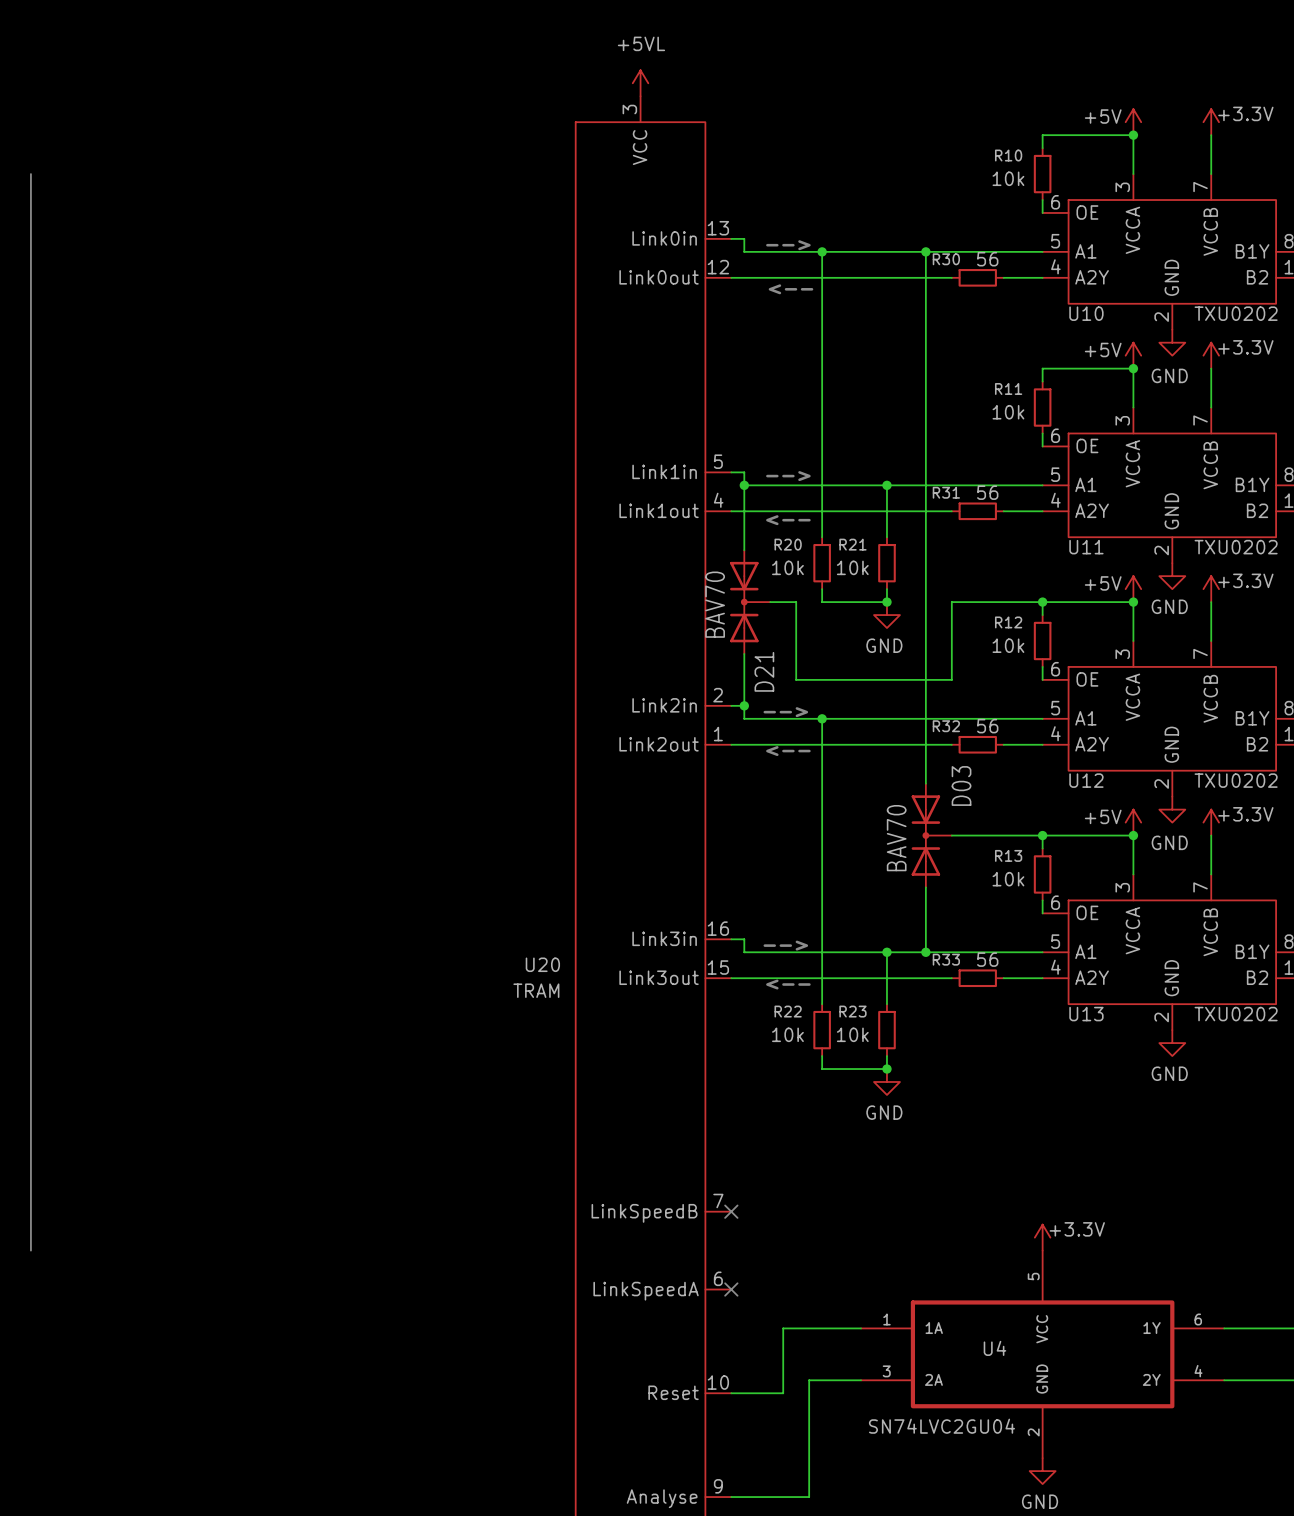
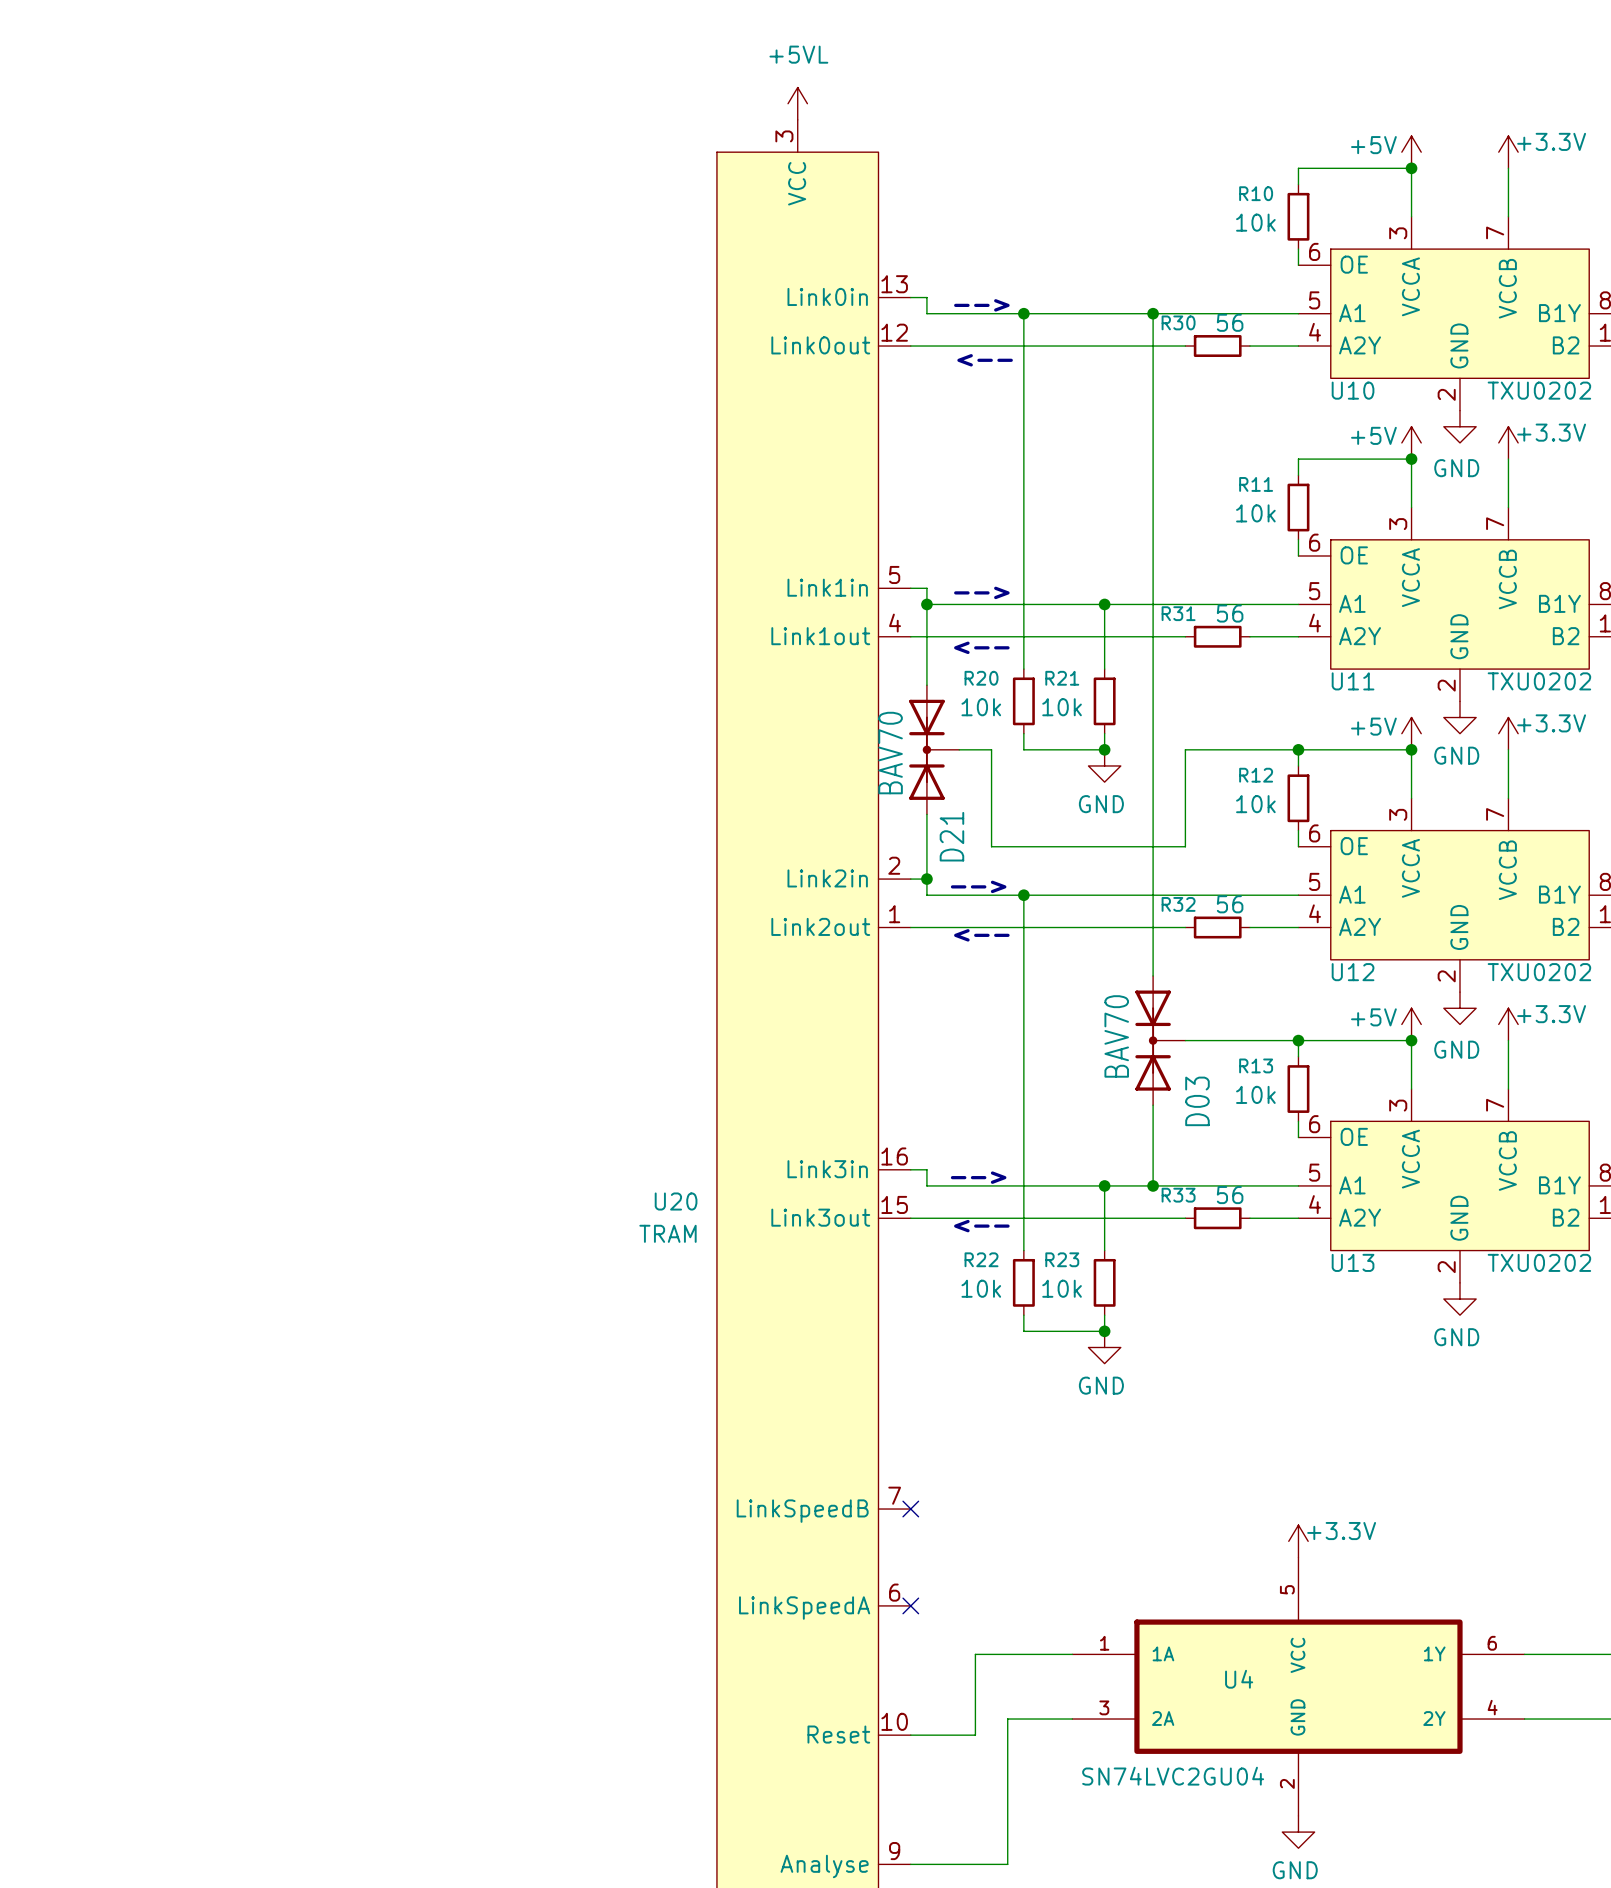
line: (30, 174) (30, 1250) -> none
D03 name position: D03 (961, 785) -> D03 (1197, 1101)
D03 value position: BAV70 (896, 838) -> BAV70 (1116, 1036)

